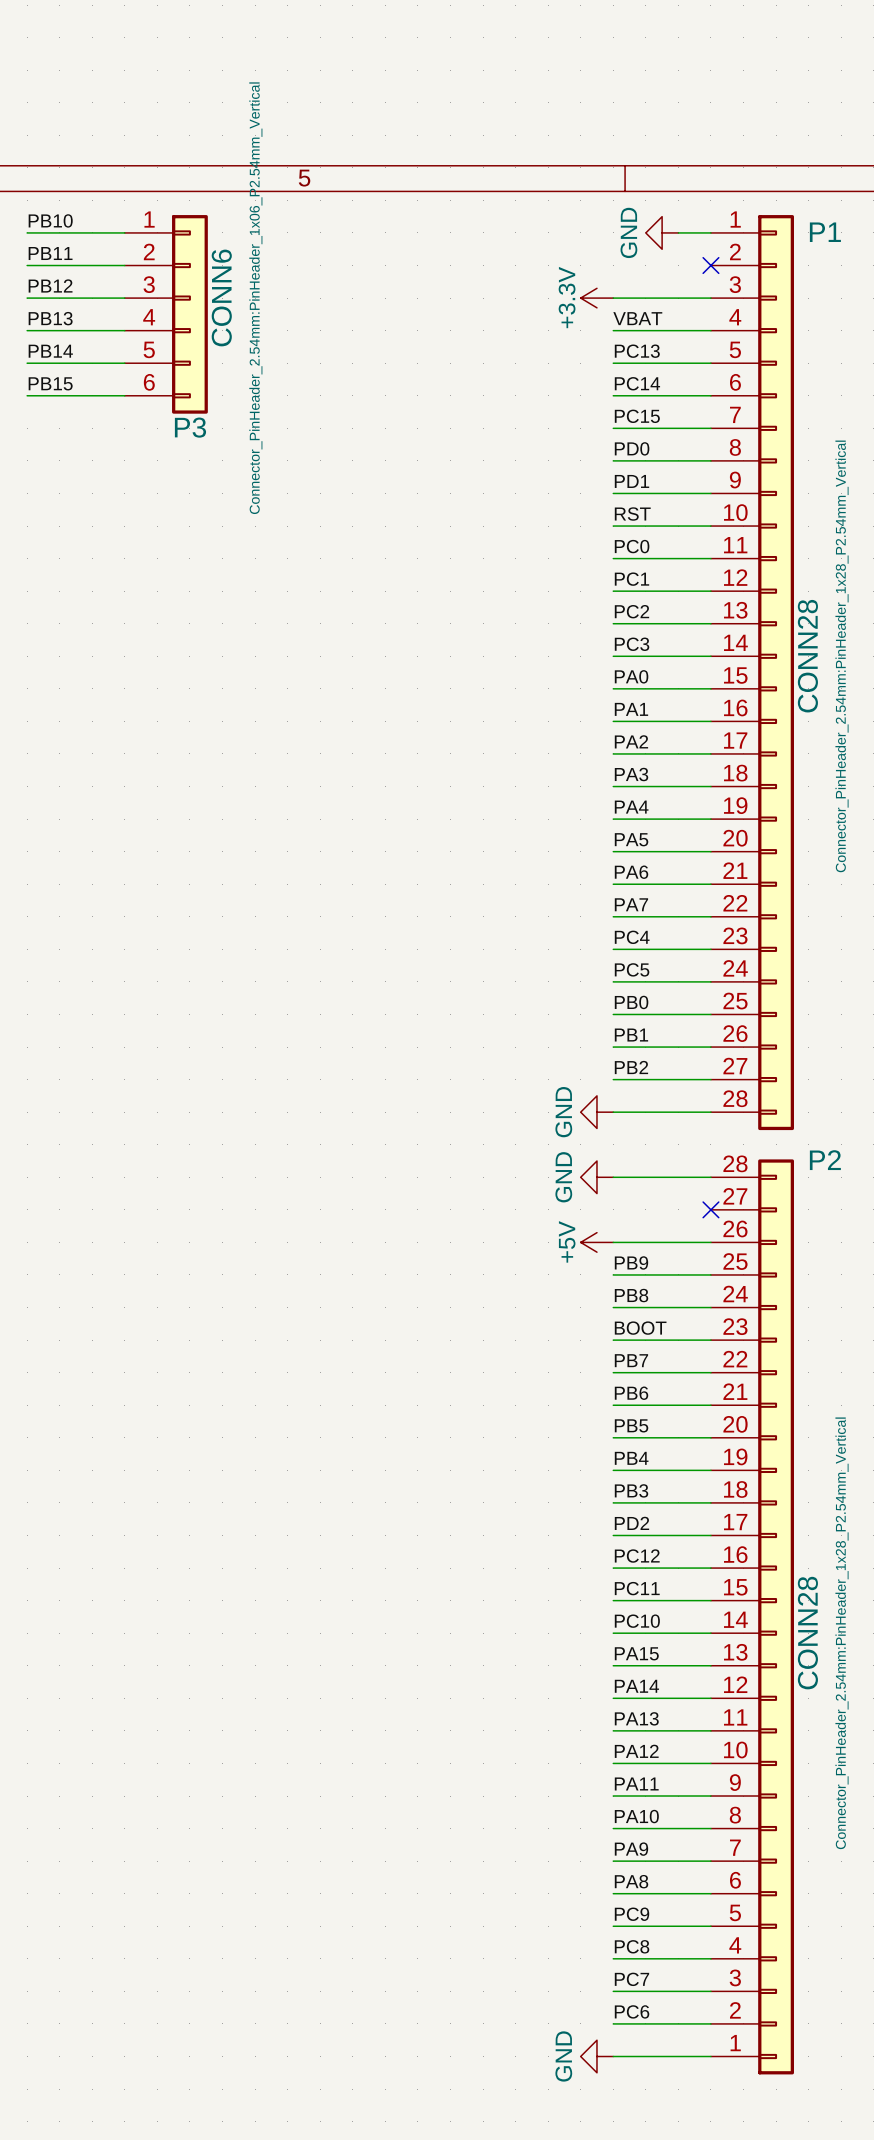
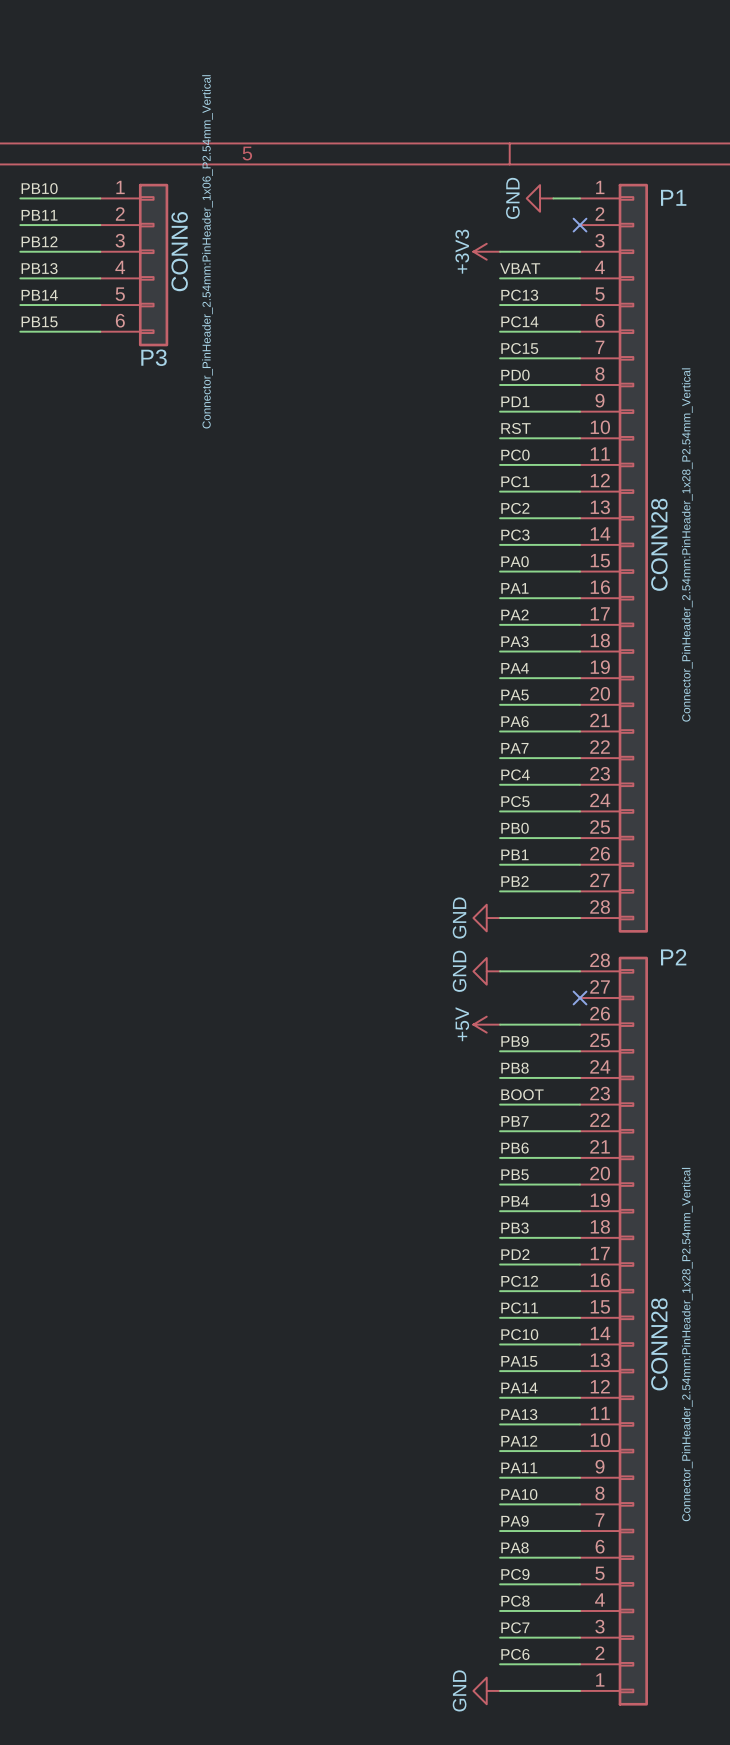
power symbol: +3.3V (596, 298) -> +3V3 (486, 251)

